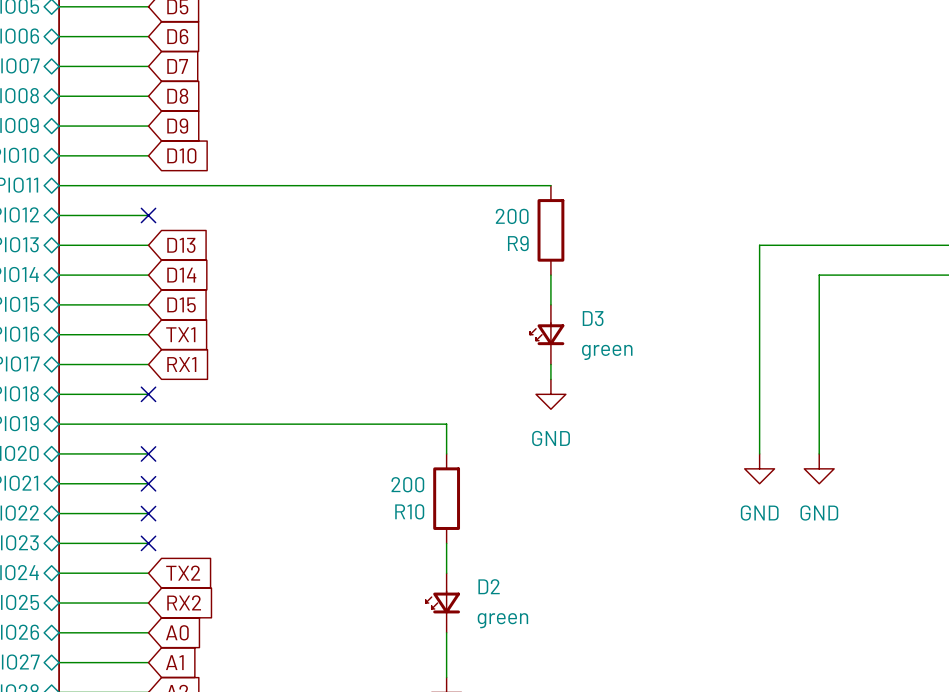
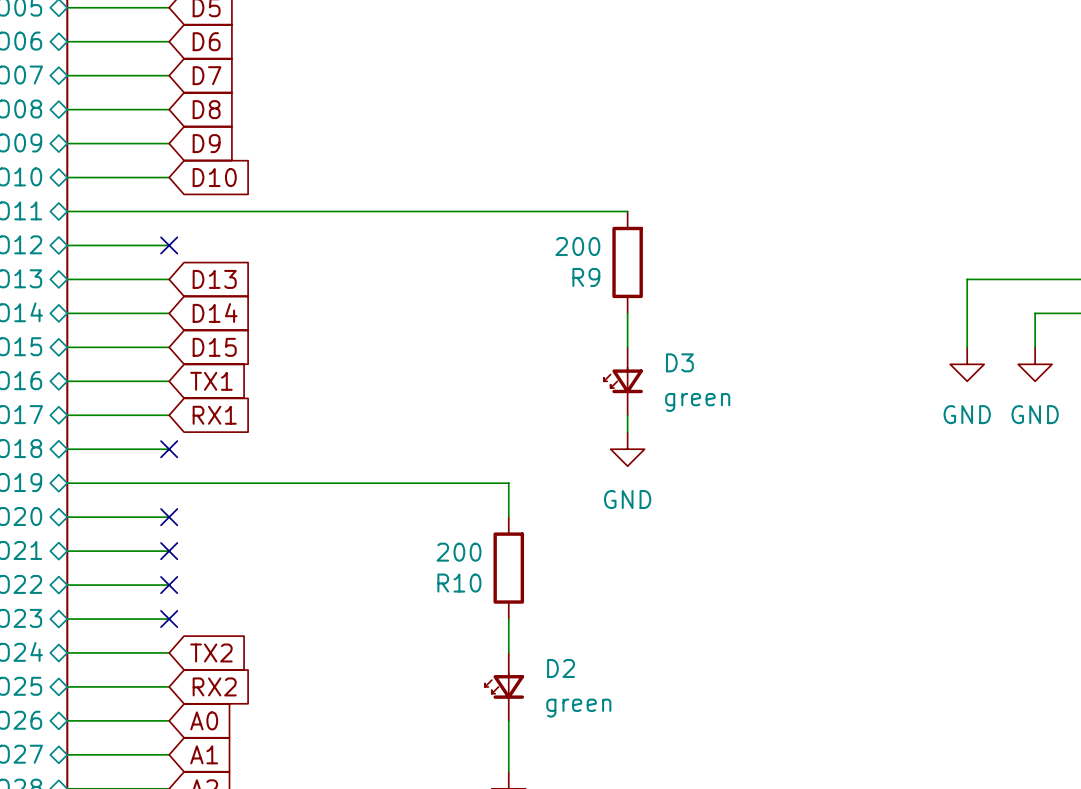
wire: (849, 245) (759, 245) (759, 453) -> (967, 279) (967, 347)
wire: (908, 275) (819, 275) (819, 453) -> (1035, 313) (1035, 347)
power symbol: none -> GND (967, 364)
power symbol: none -> GND (1035, 364)
power symbol: GND (759, 468) -> none
power symbol: GND (819, 468) -> none

